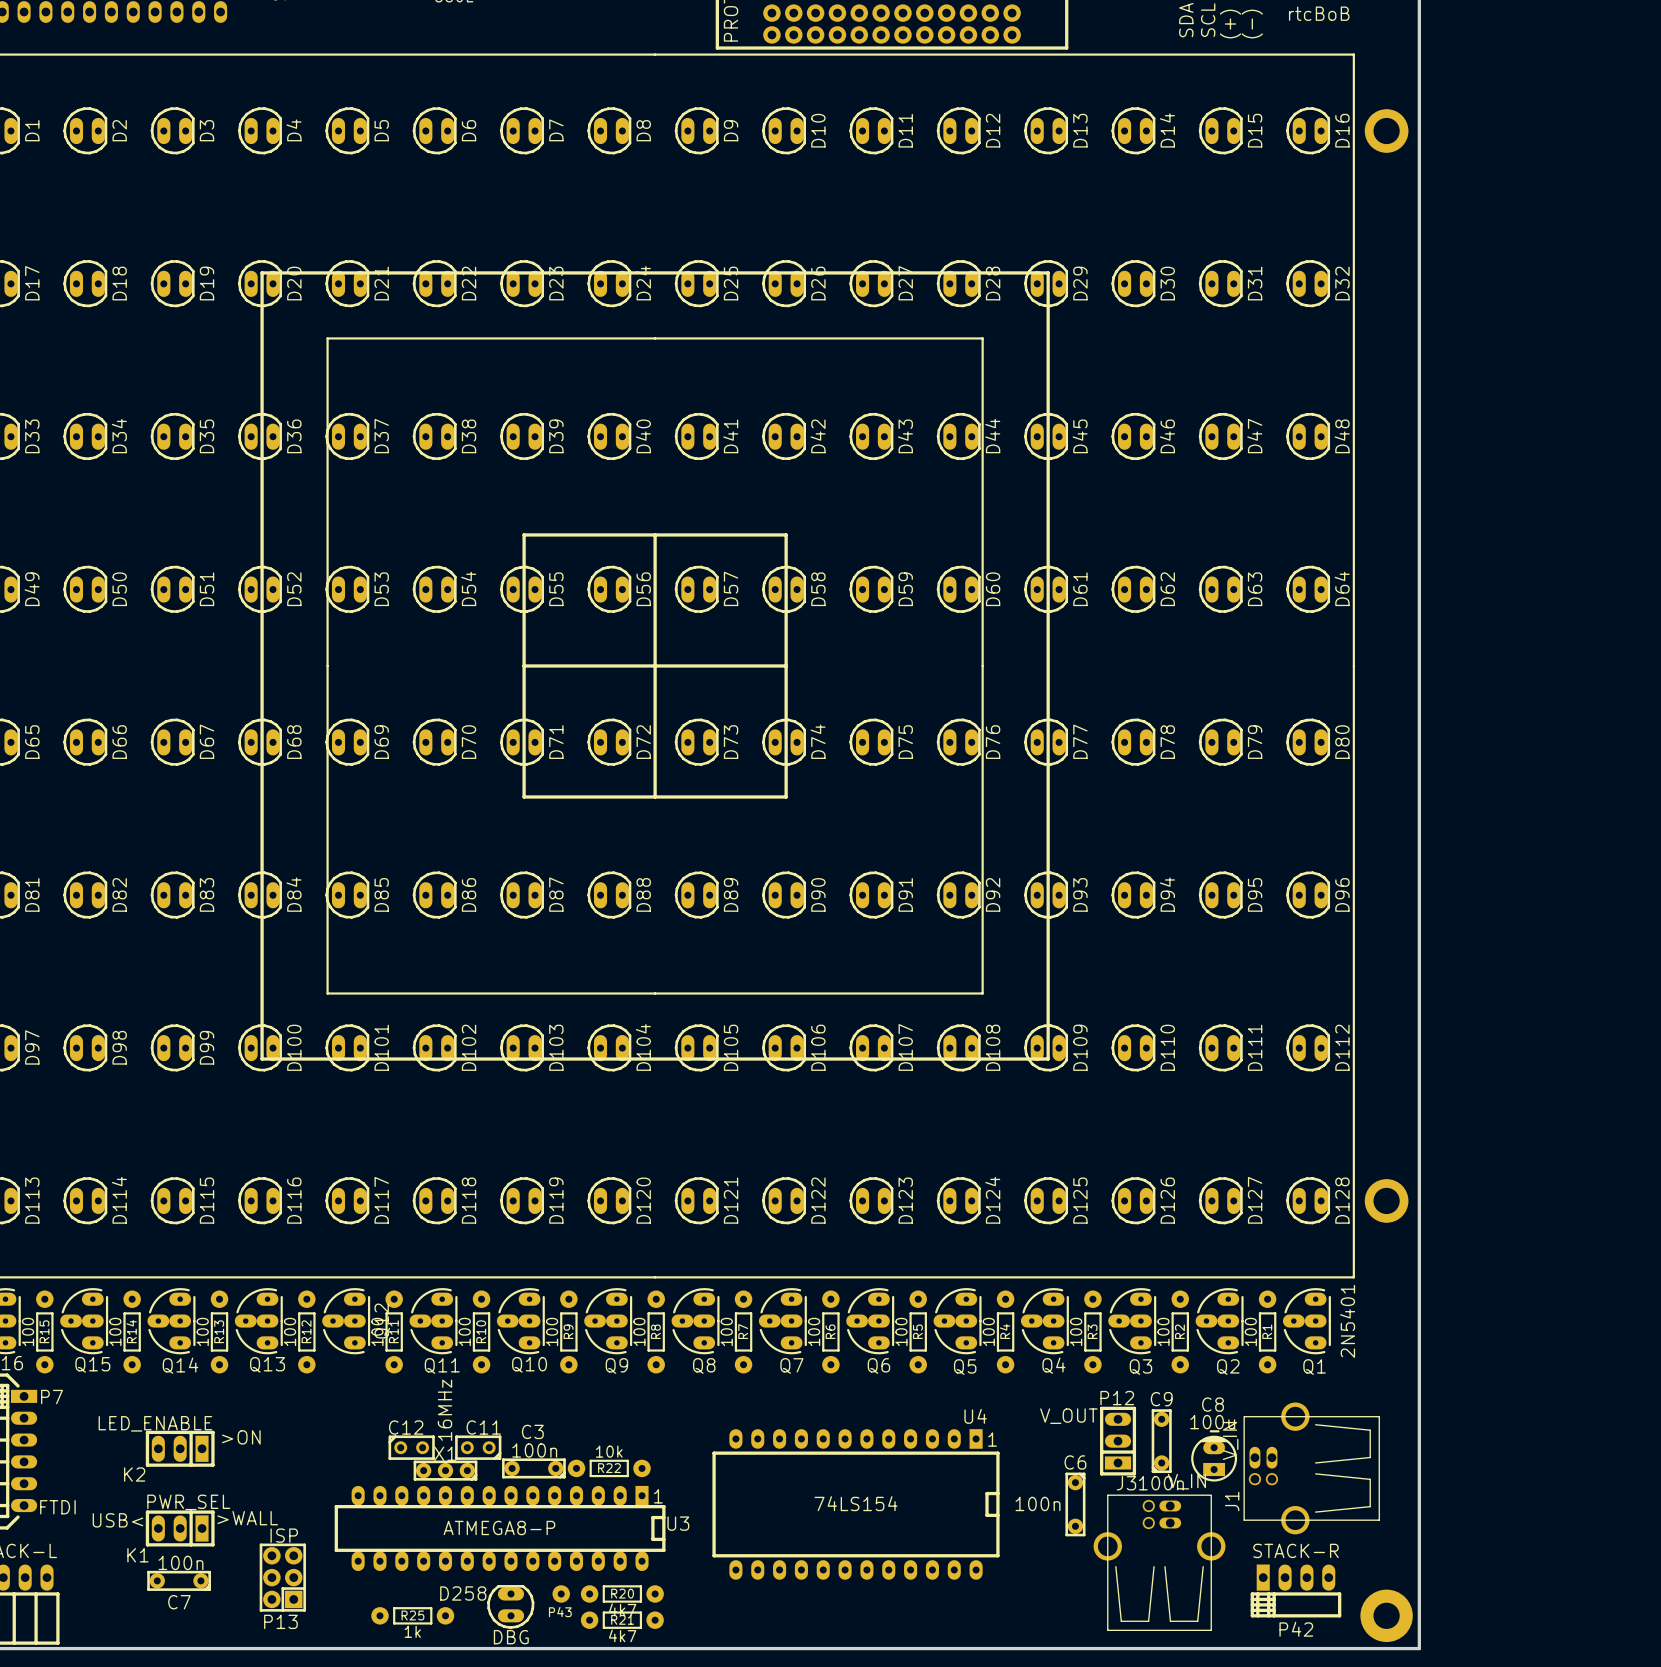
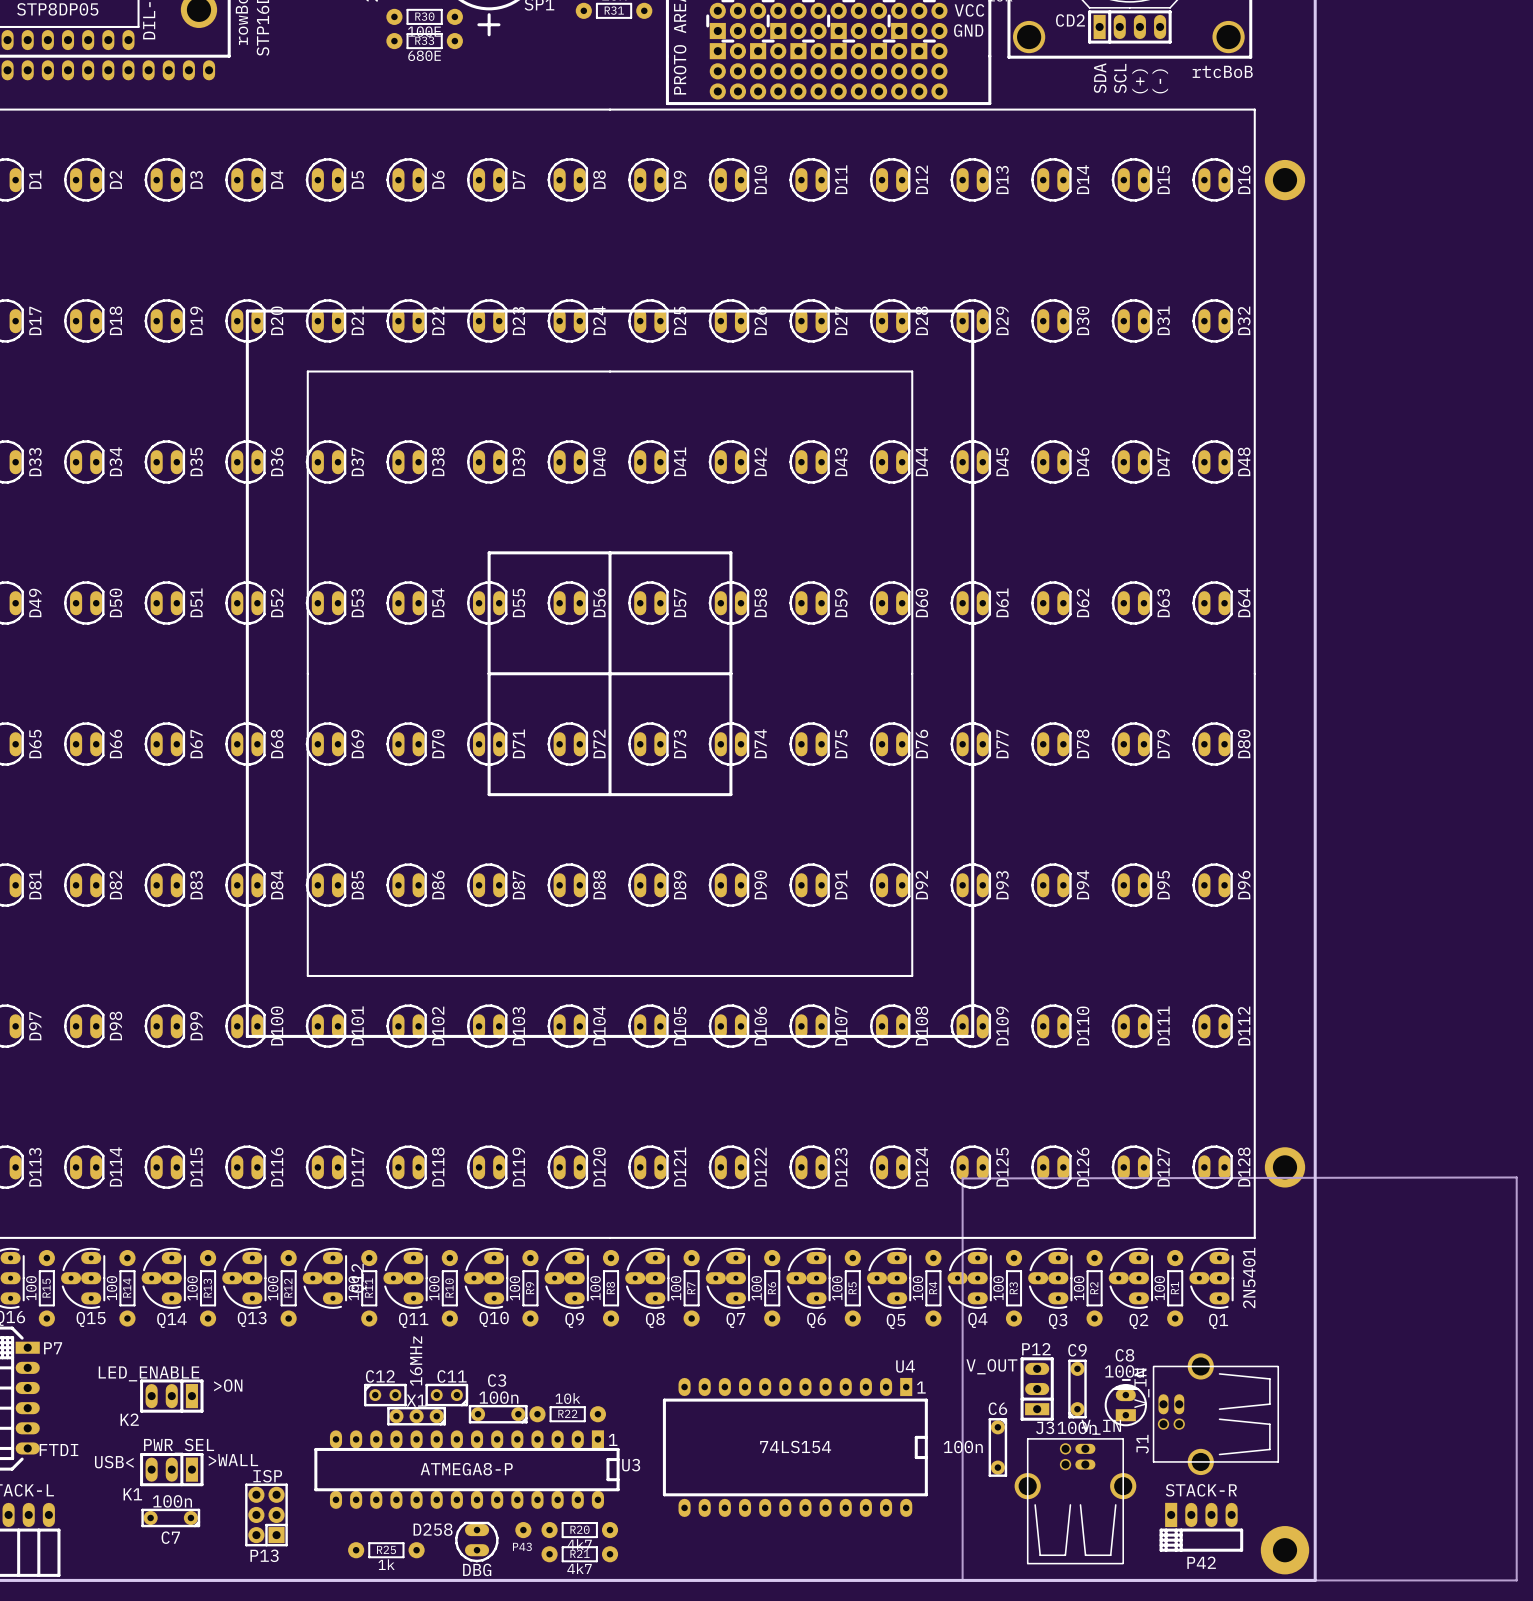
line: none -> (1516, 1177) (962, 1178) (962, 1580) (1516, 1580) (1516, 1177)

